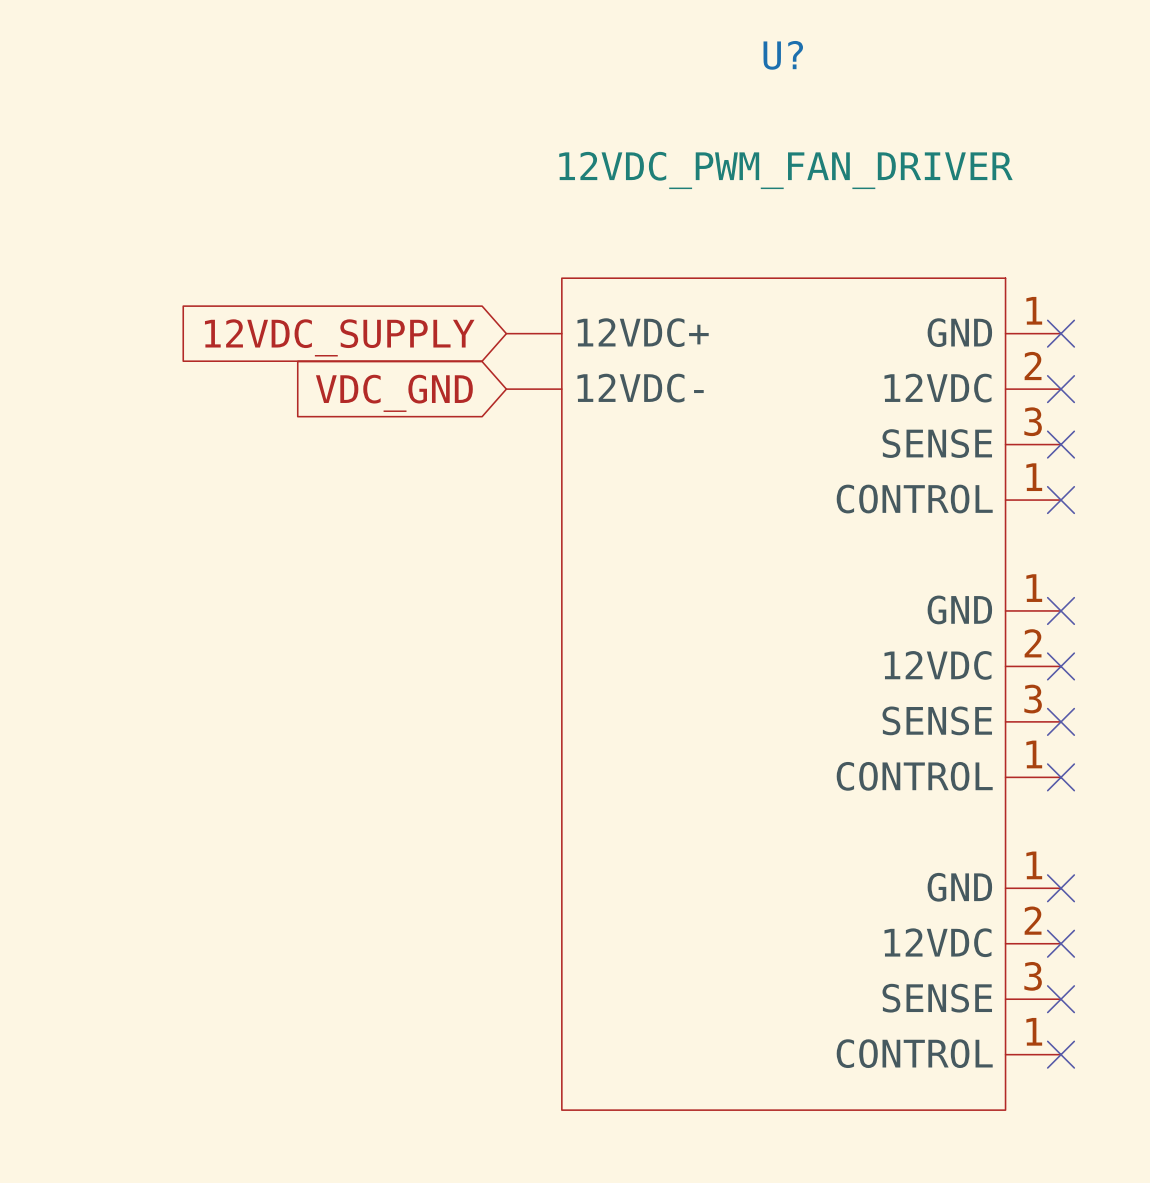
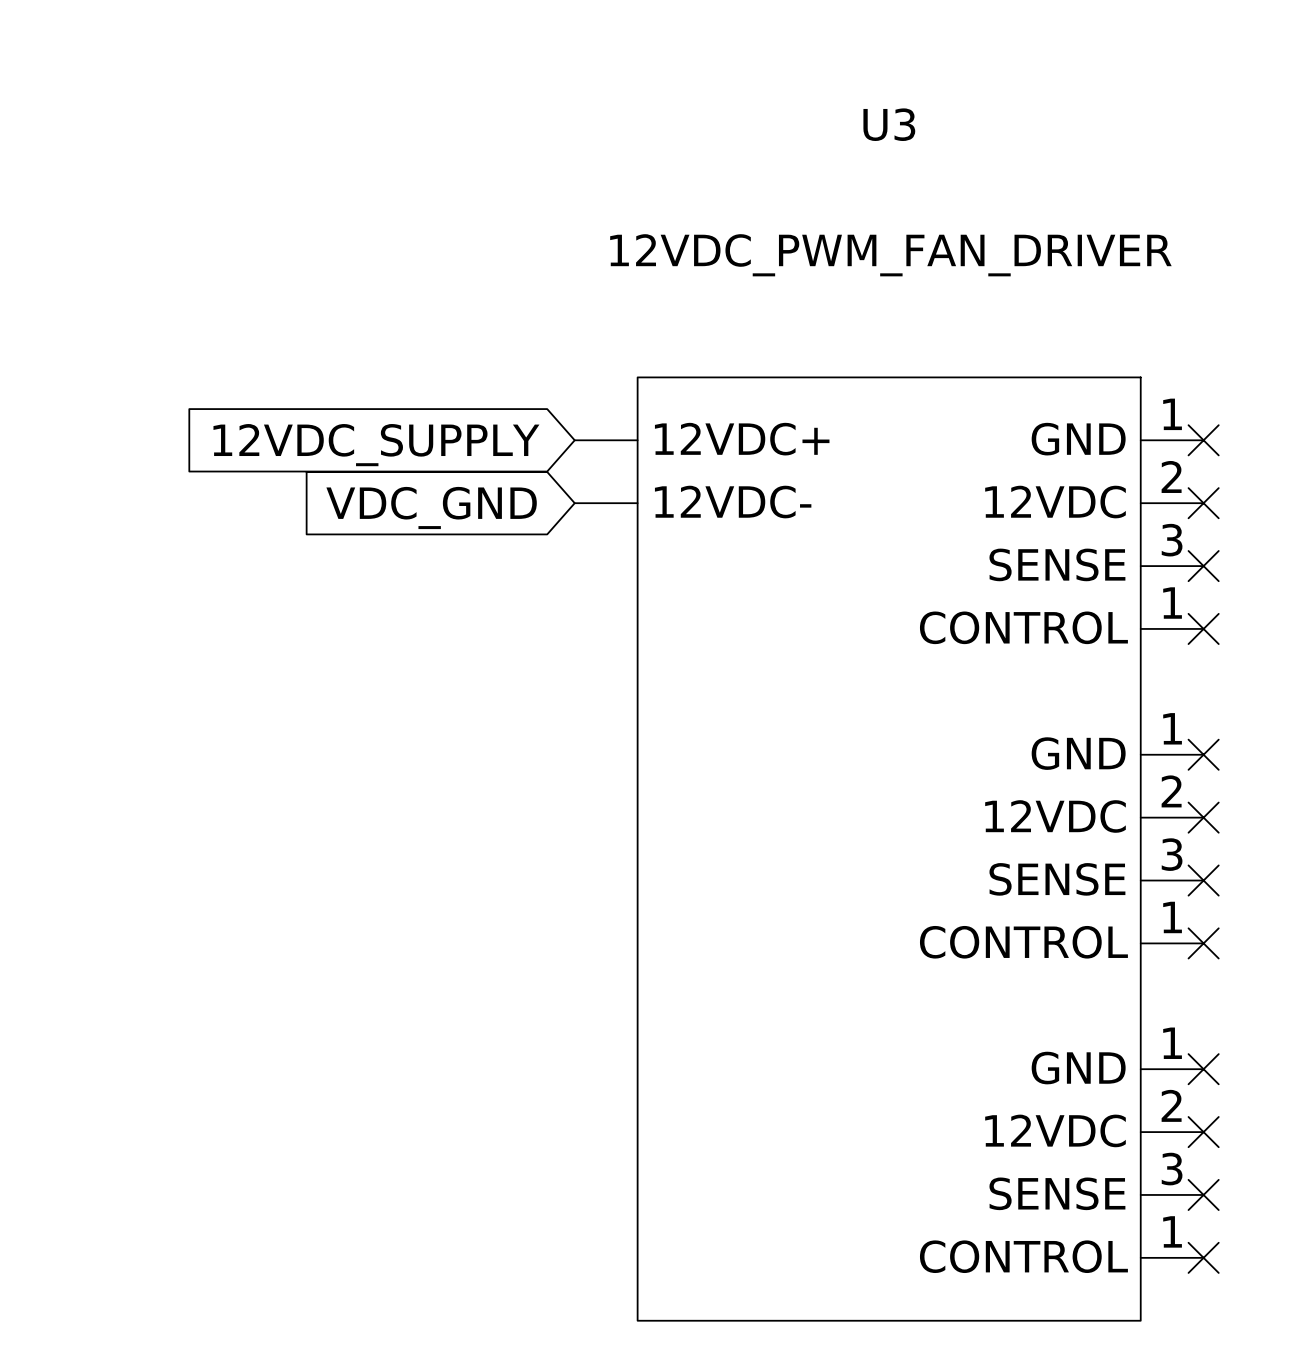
U? name: U? (783, 55) -> U3 (889, 124)

